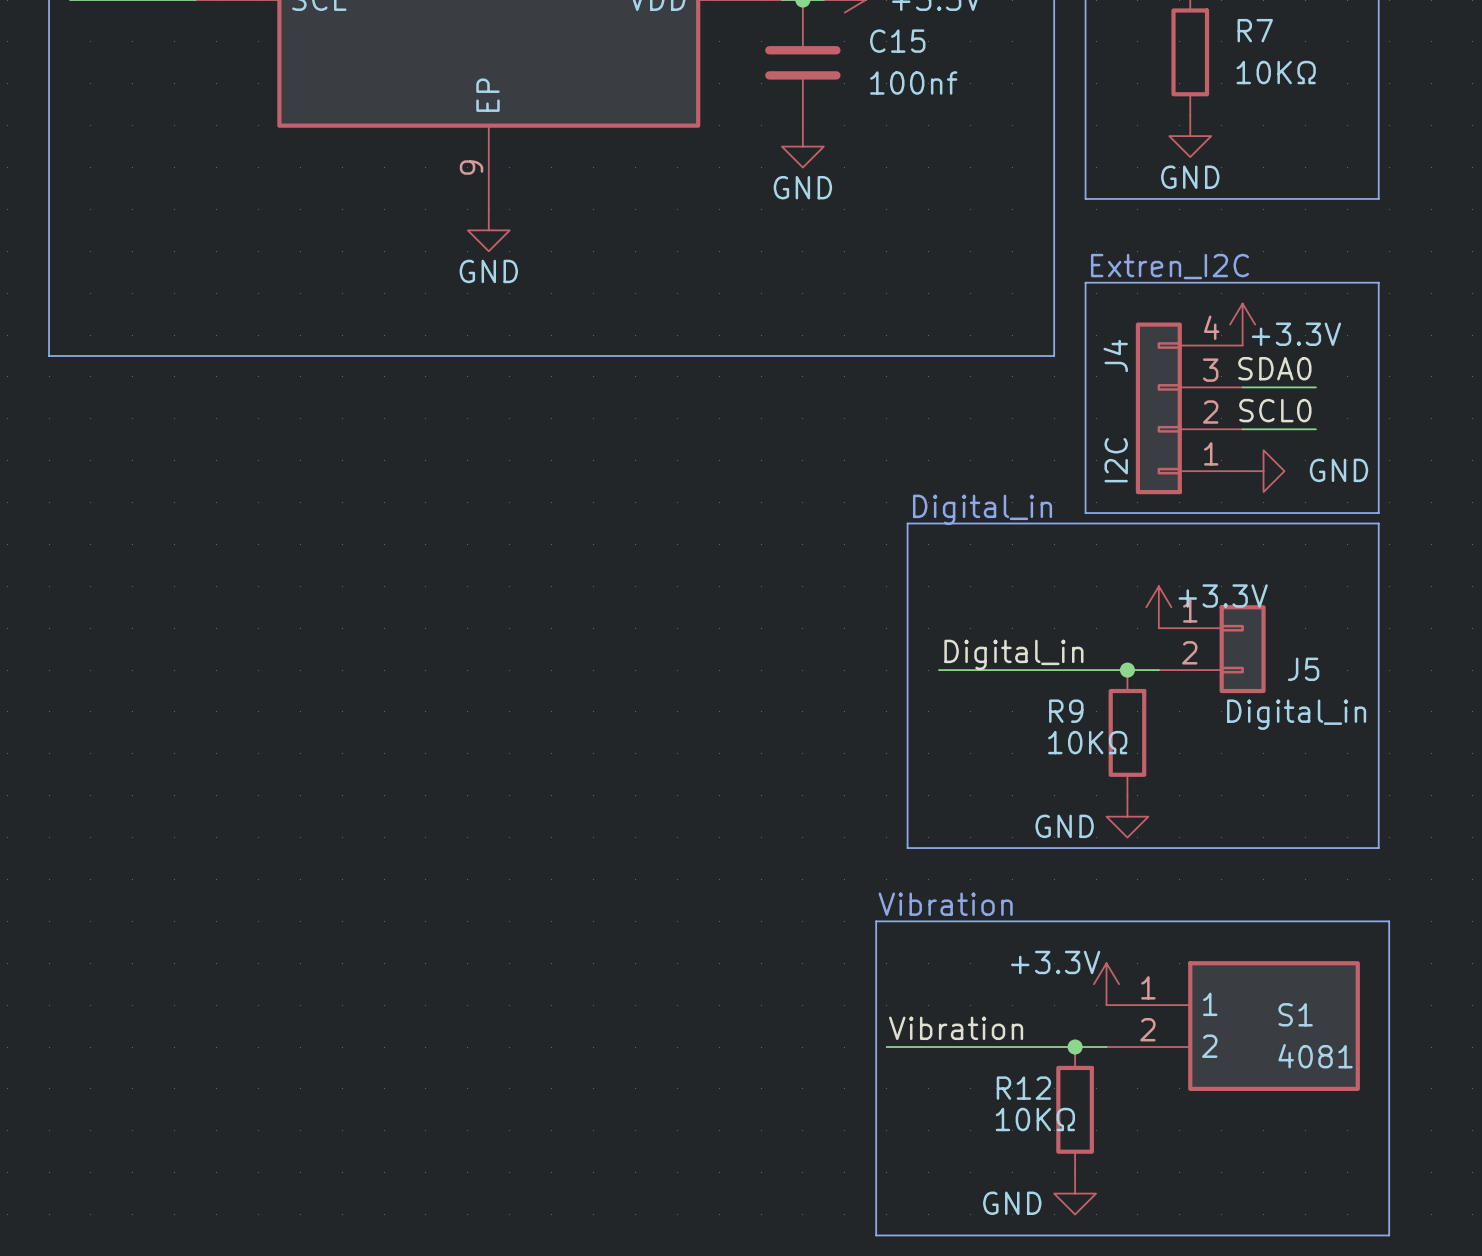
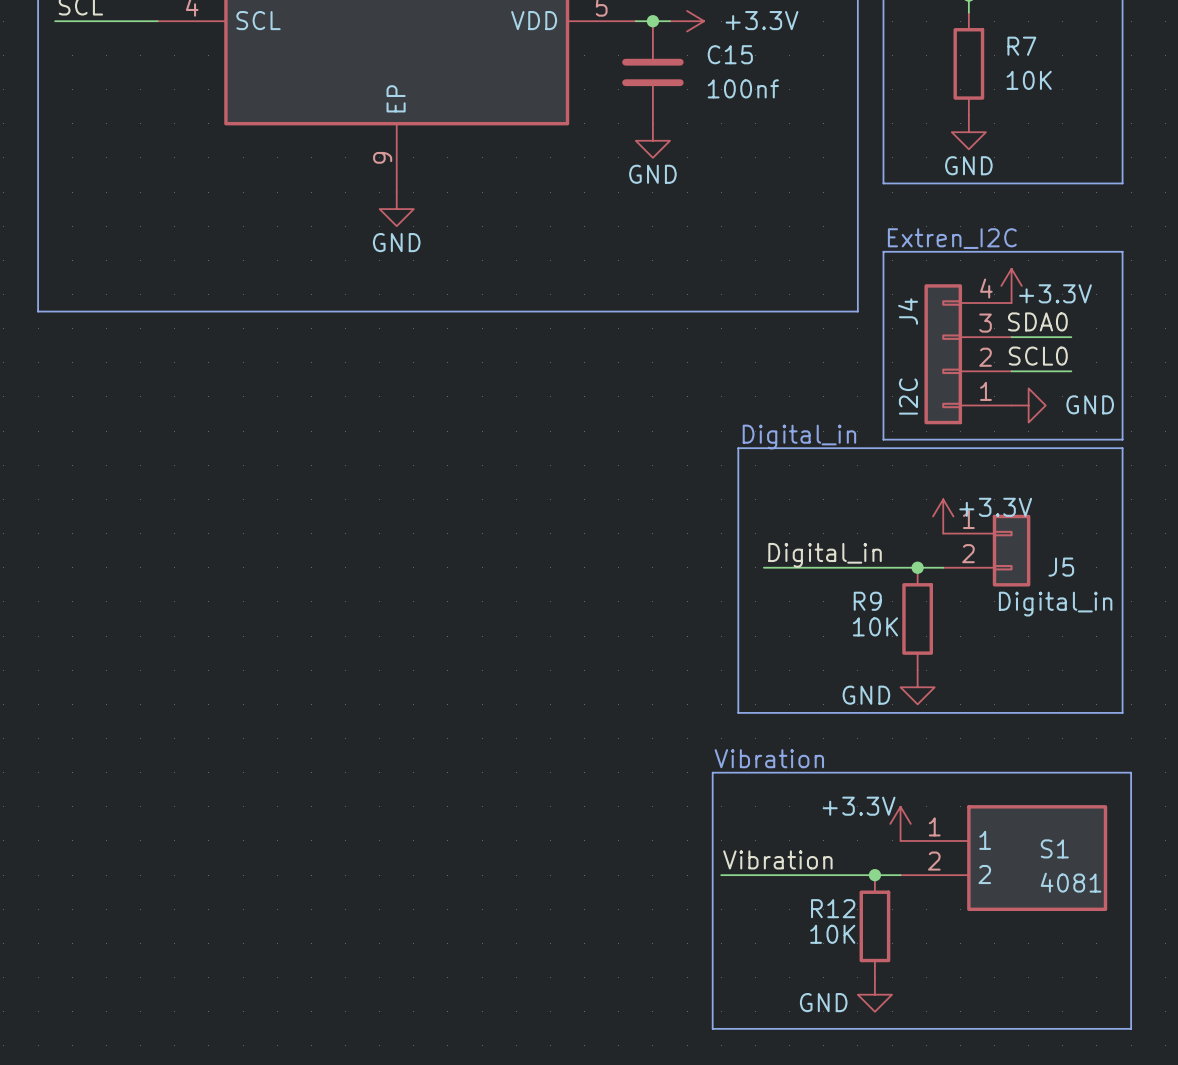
R7 value: 10KΩ (1276, 72) -> 10K (1029, 80)
R9 value: 10KΩ (1087, 742) -> 10K (875, 626)
R12 value: 10KΩ (1035, 1119) -> 10K (832, 934)

